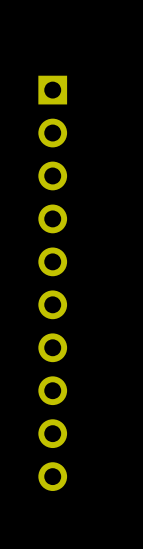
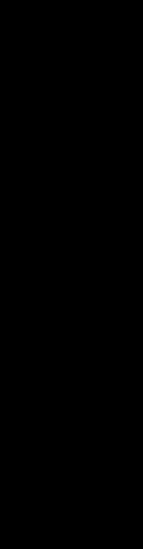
part: (52, 283) -> none

